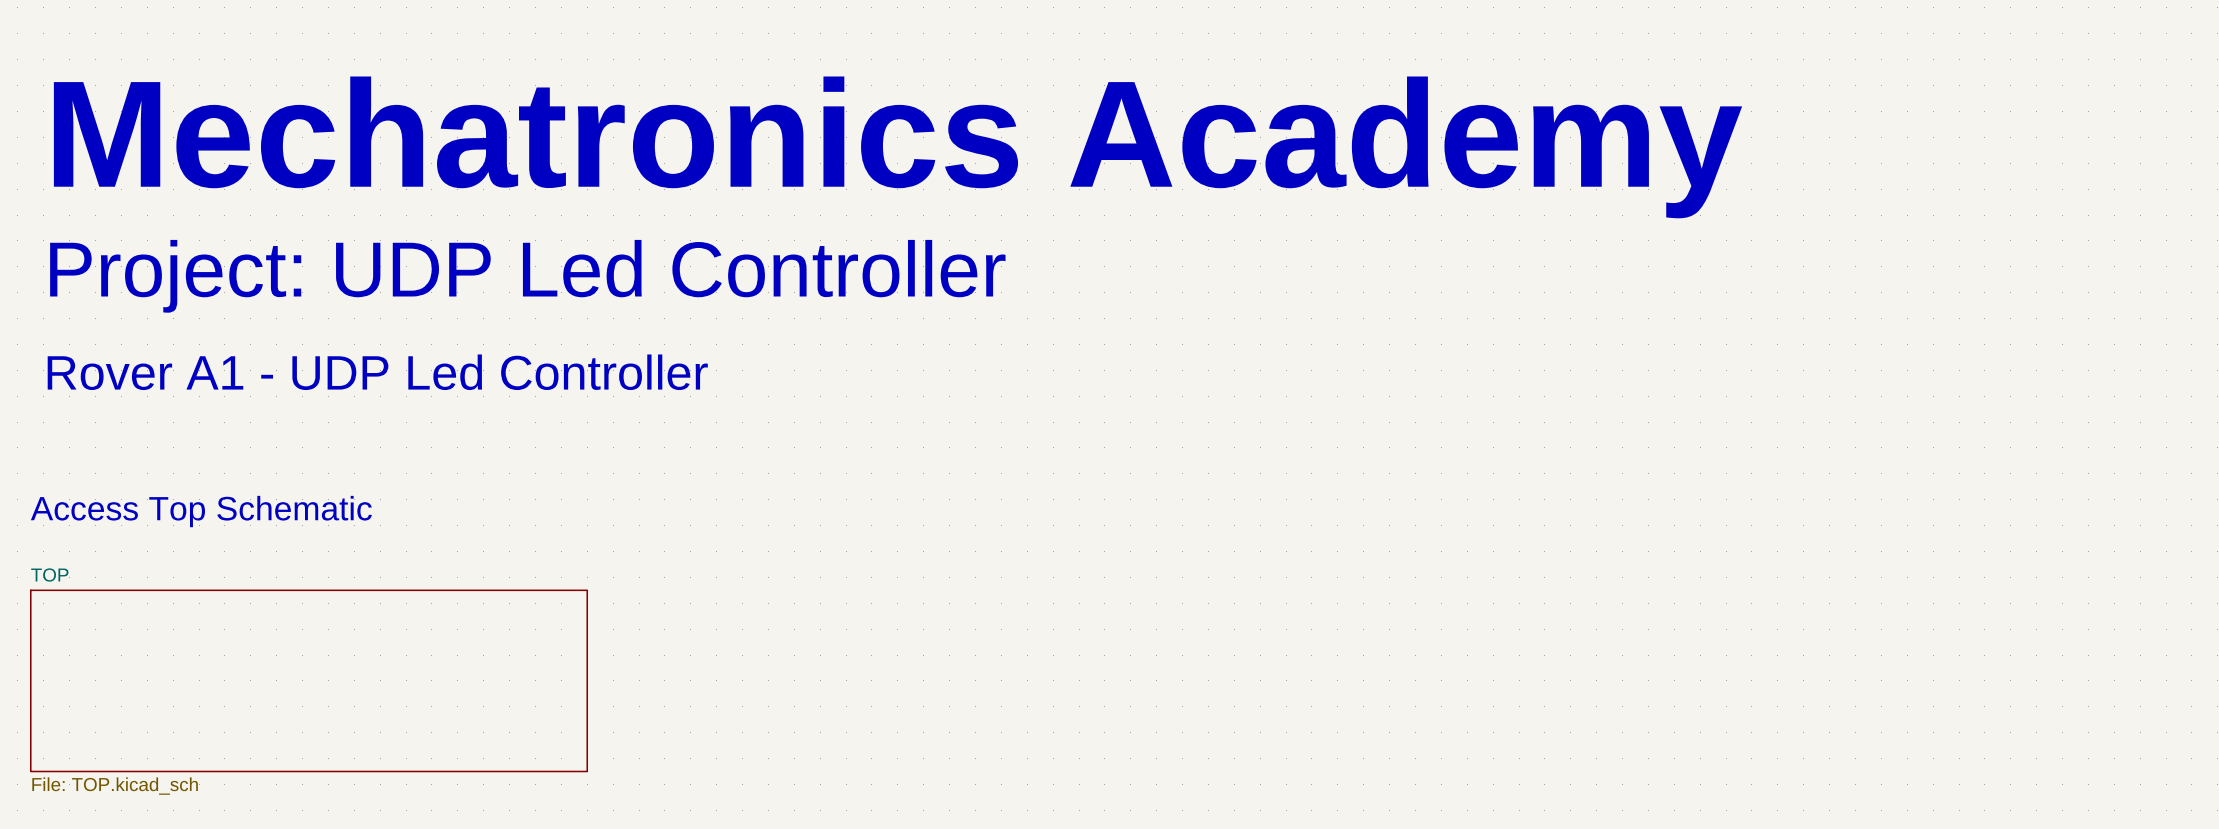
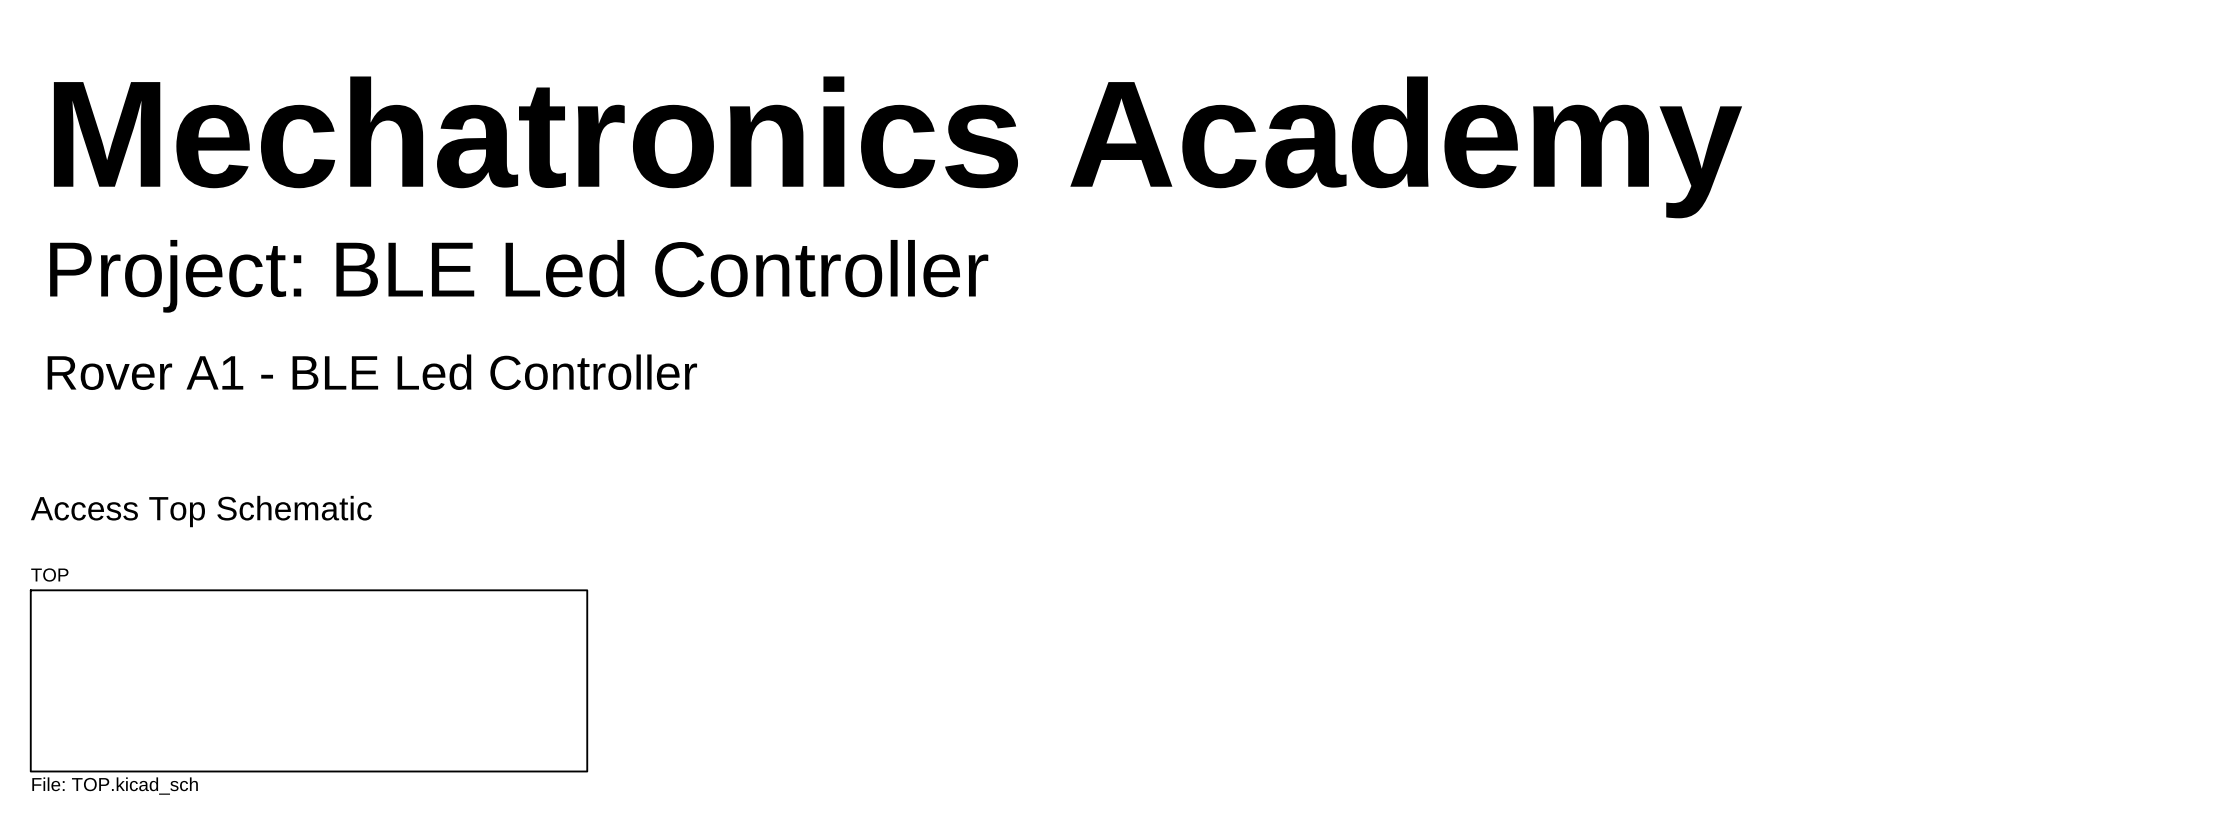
text: Project: UDP Led Controller (527, 276) -> Project: BLE Led Controller (519, 276)
text: Rover A1 - UDP Led Controller (377, 372) -> Rover A1 - BLE Led Controller (372, 372)

